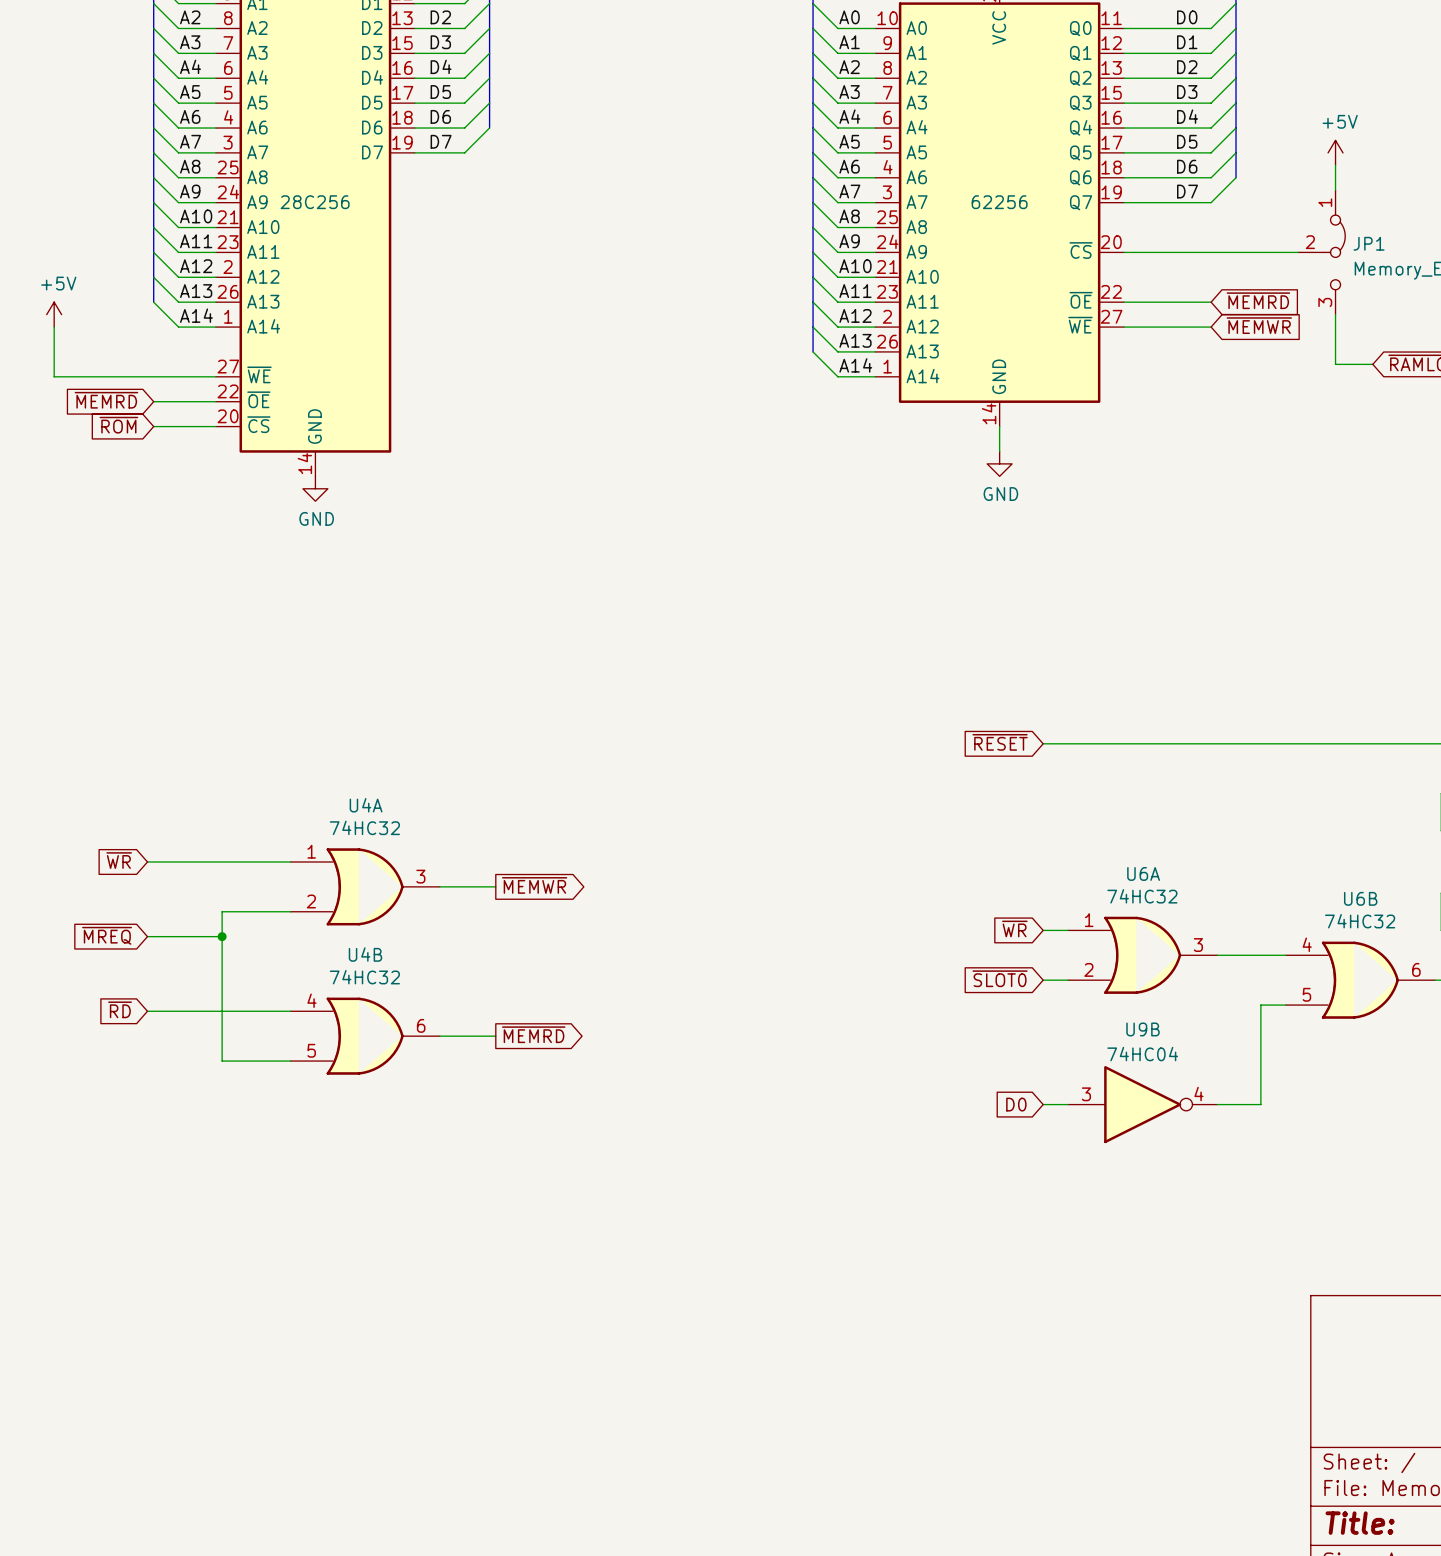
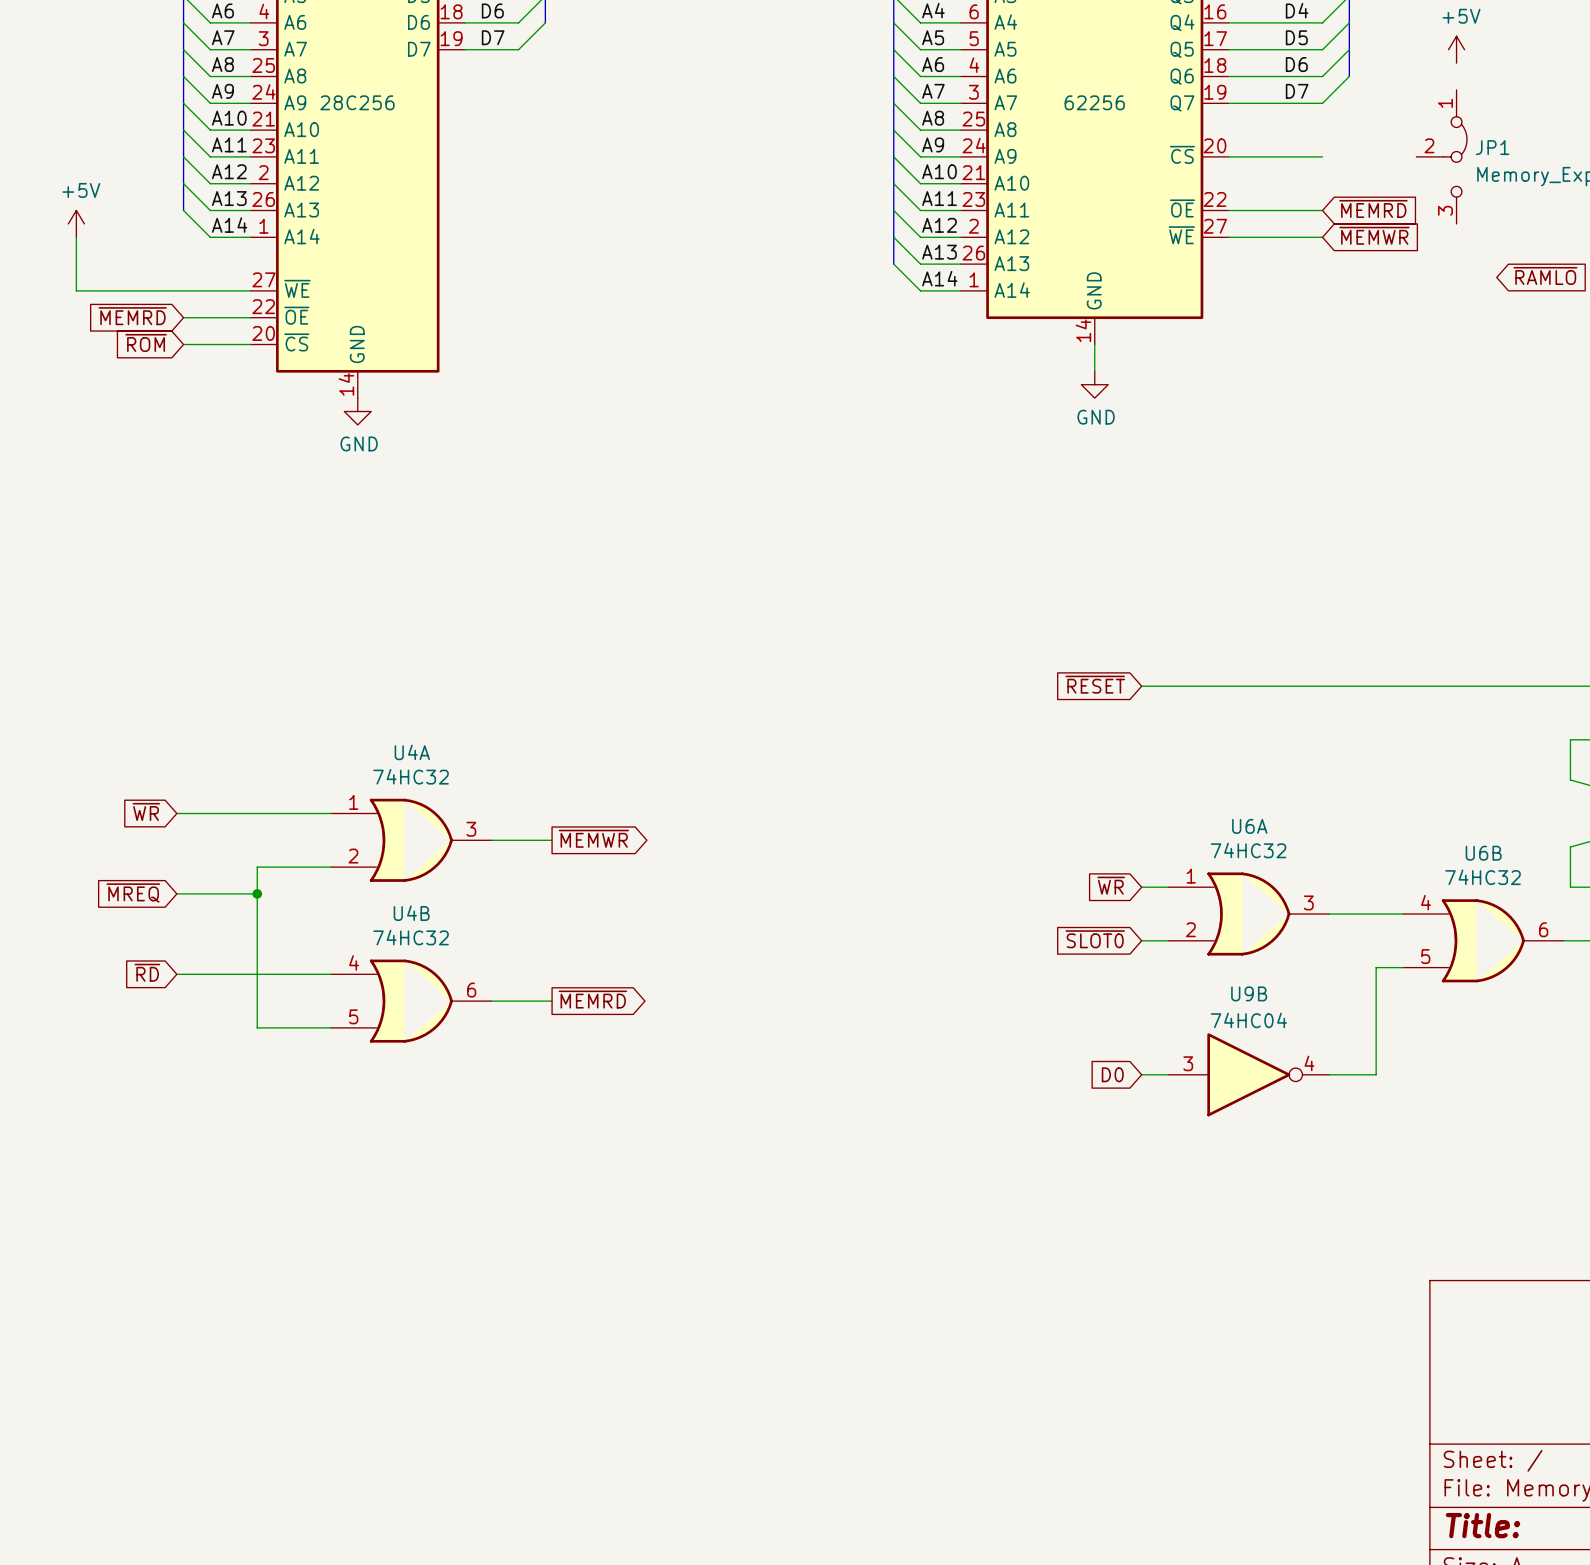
wire: (1335, 165) (1335, 190) -> none
wire: (1211, 252) (1298, 252) -> none
wire: (1335, 314) (1335, 364) (1372, 364) -> none

